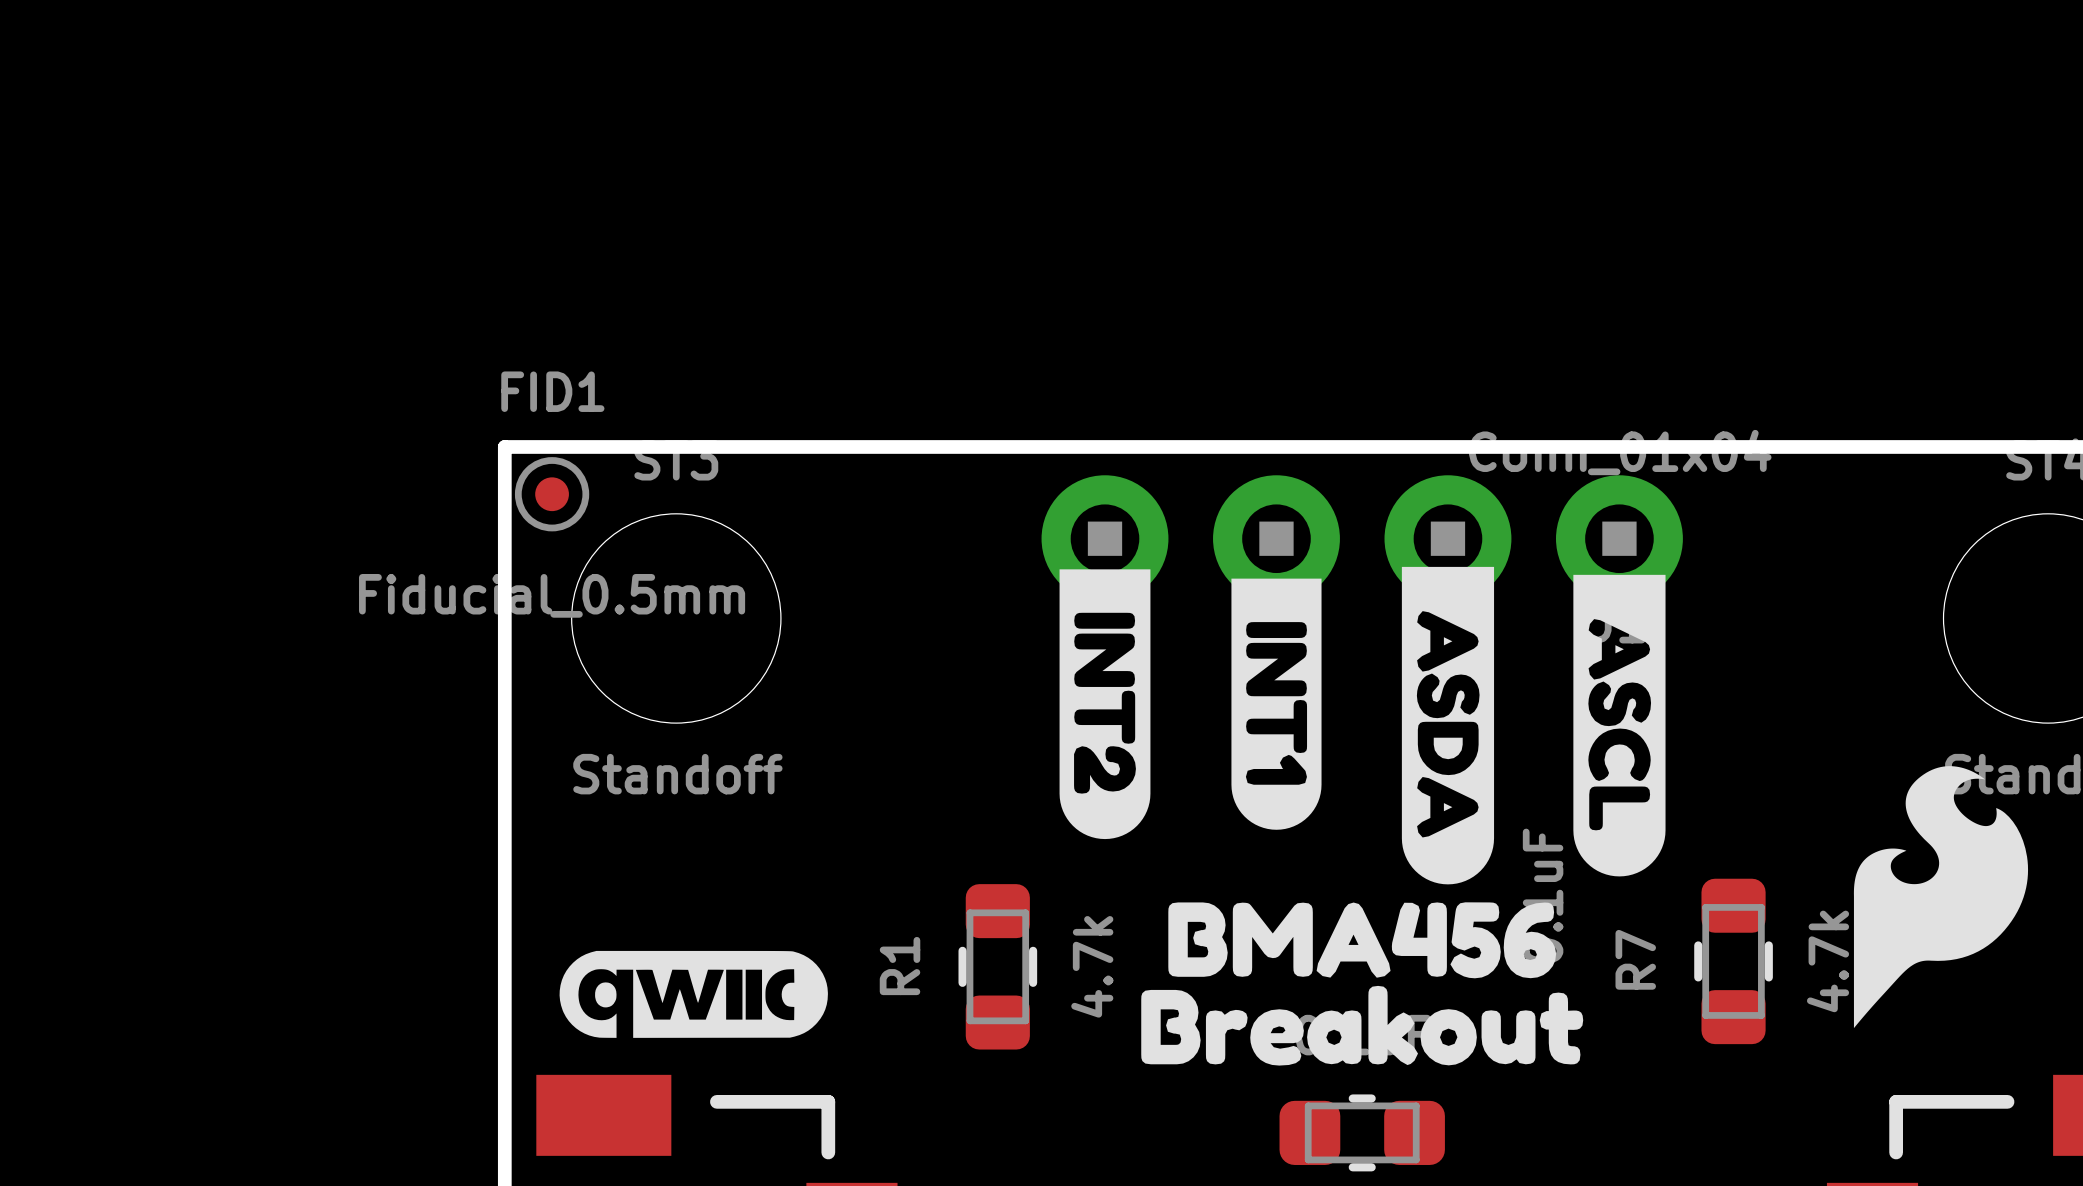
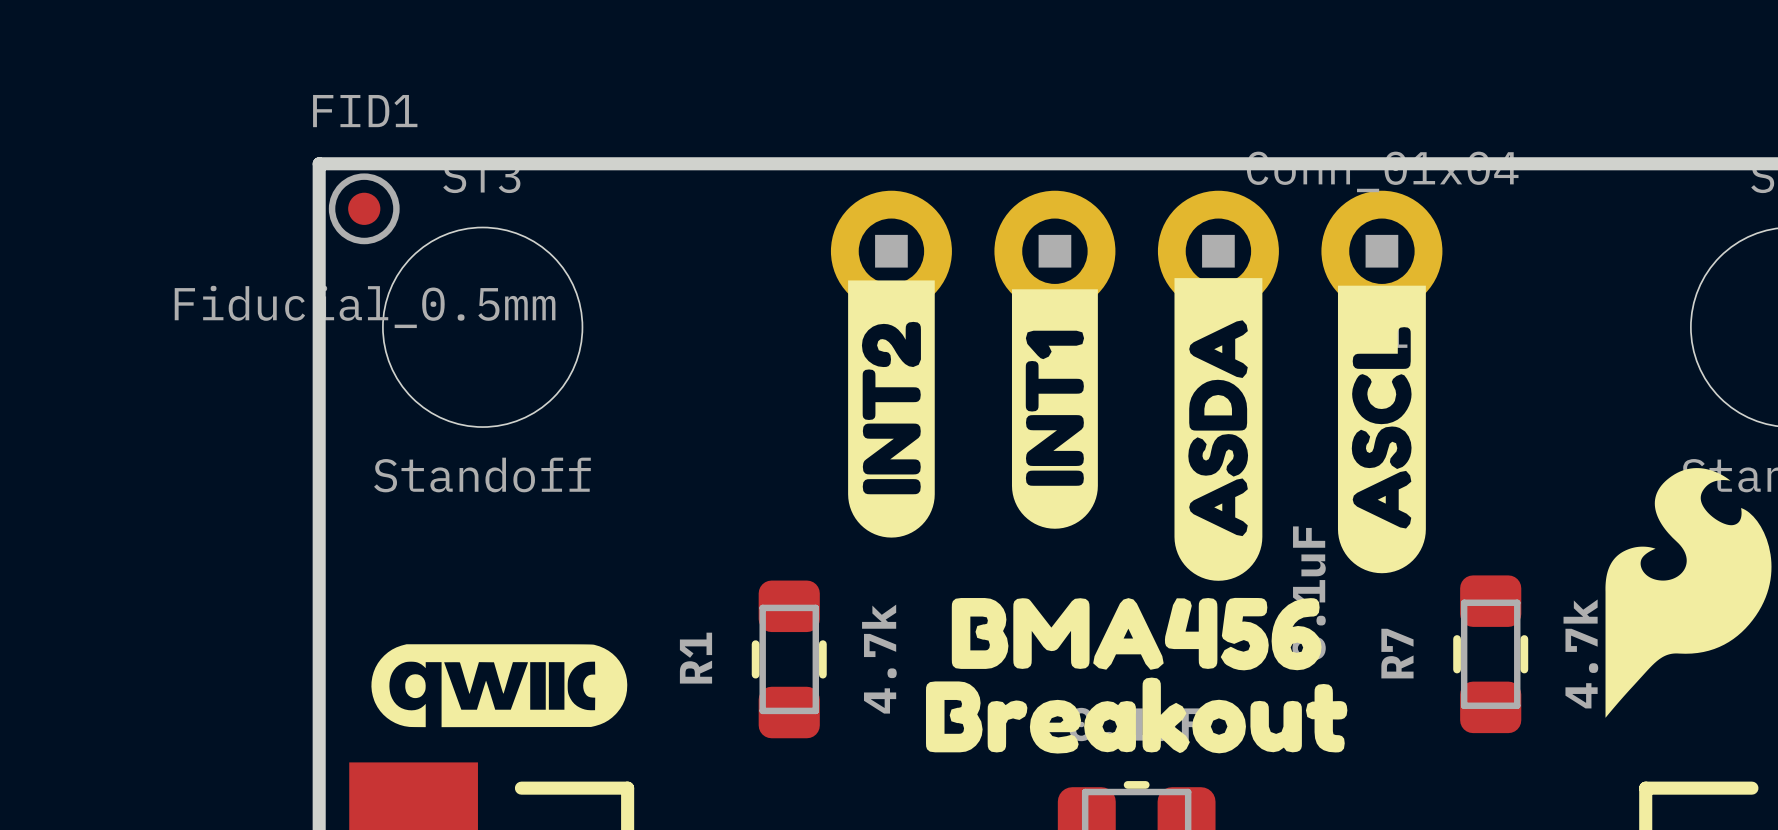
drawing shape: [1401, 566, 1495, 885] -> [1174, 278, 1263, 581]
drawing shape: [1059, 569, 1151, 840] -> [848, 280, 935, 538]
drawing shape: [1573, 574, 1666, 877] -> [1337, 285, 1426, 574]
drawing shape: [1231, 578, 1322, 830] -> [1011, 289, 1098, 529]

